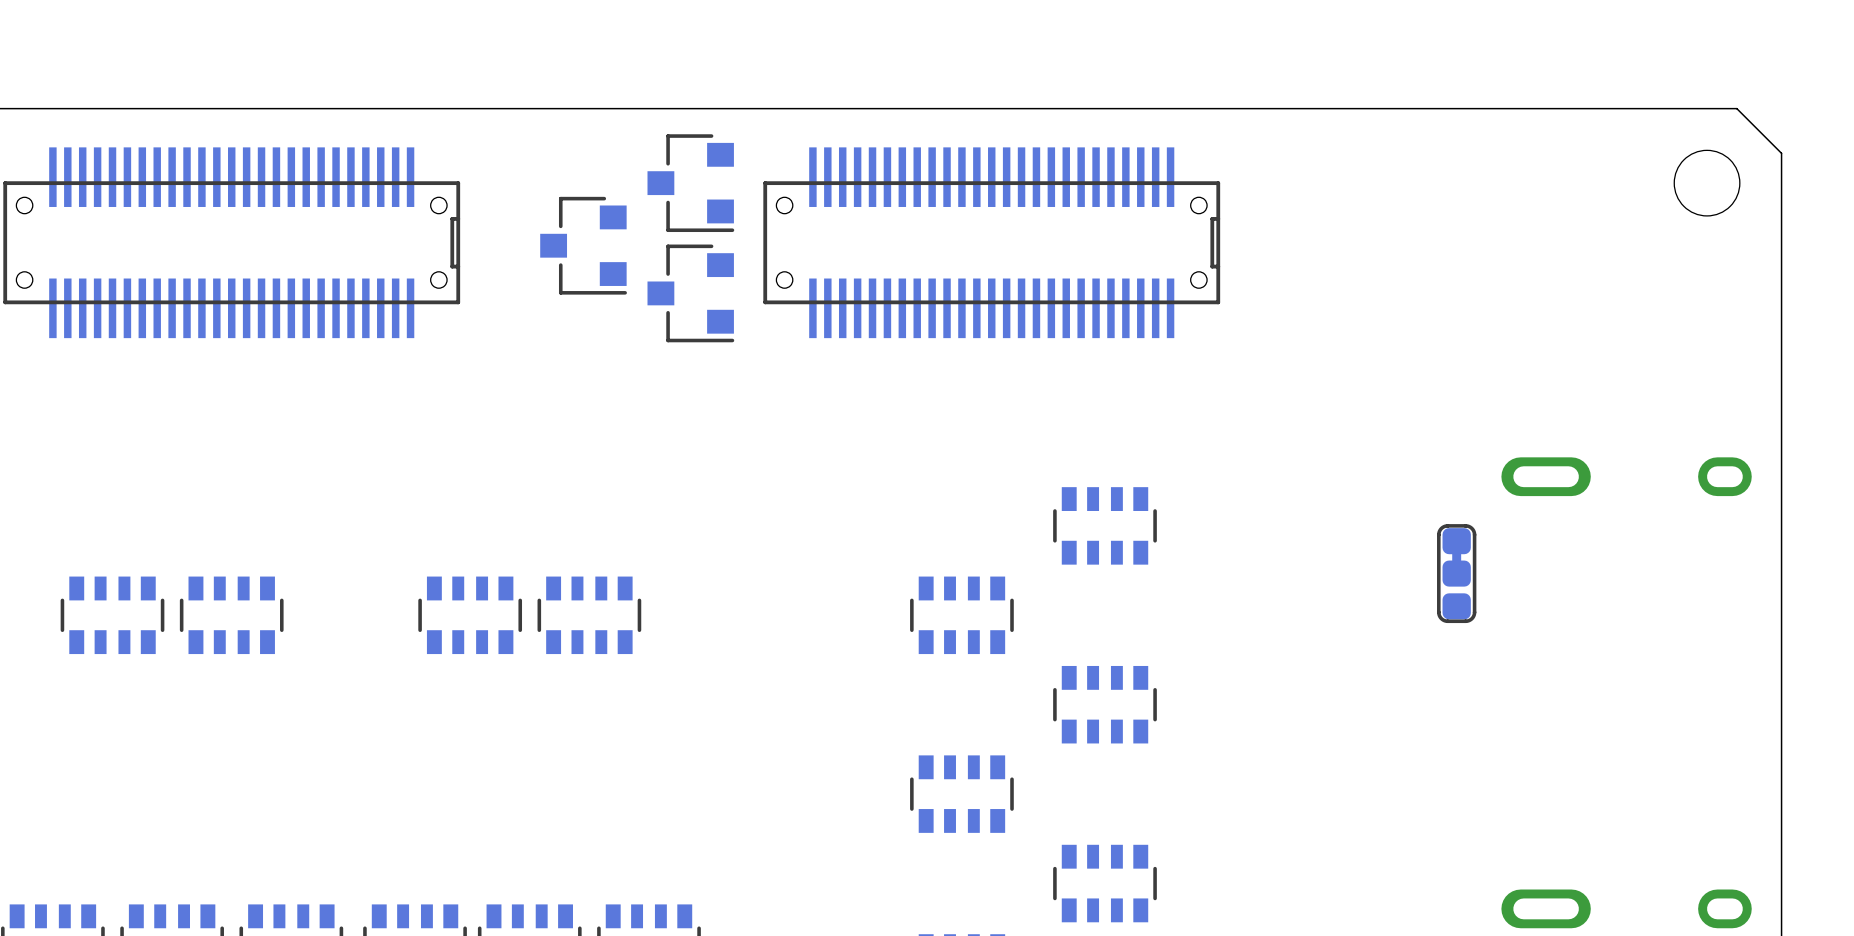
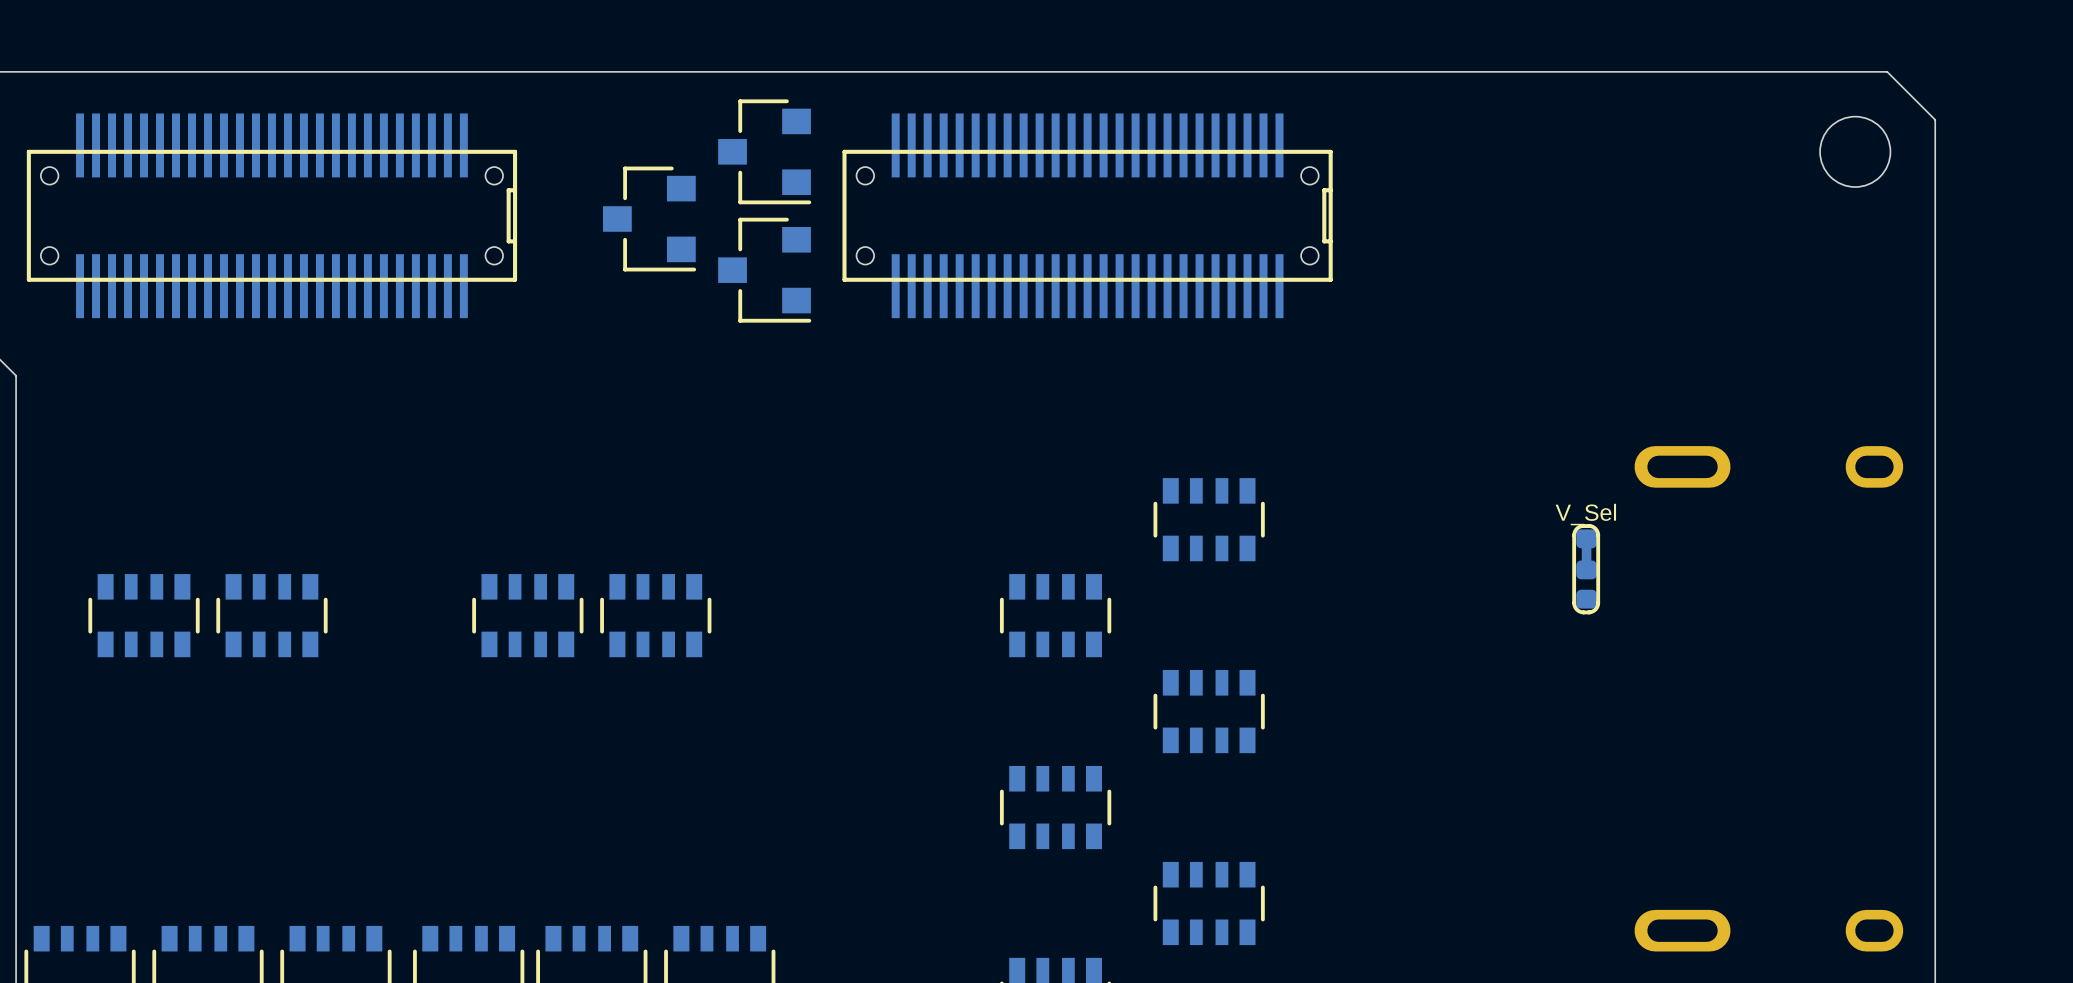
part value: none -> V_Sel (1585, 514)
part footprint: [1437, 524, 1477, 624] -> [1572, 523, 1601, 615]

